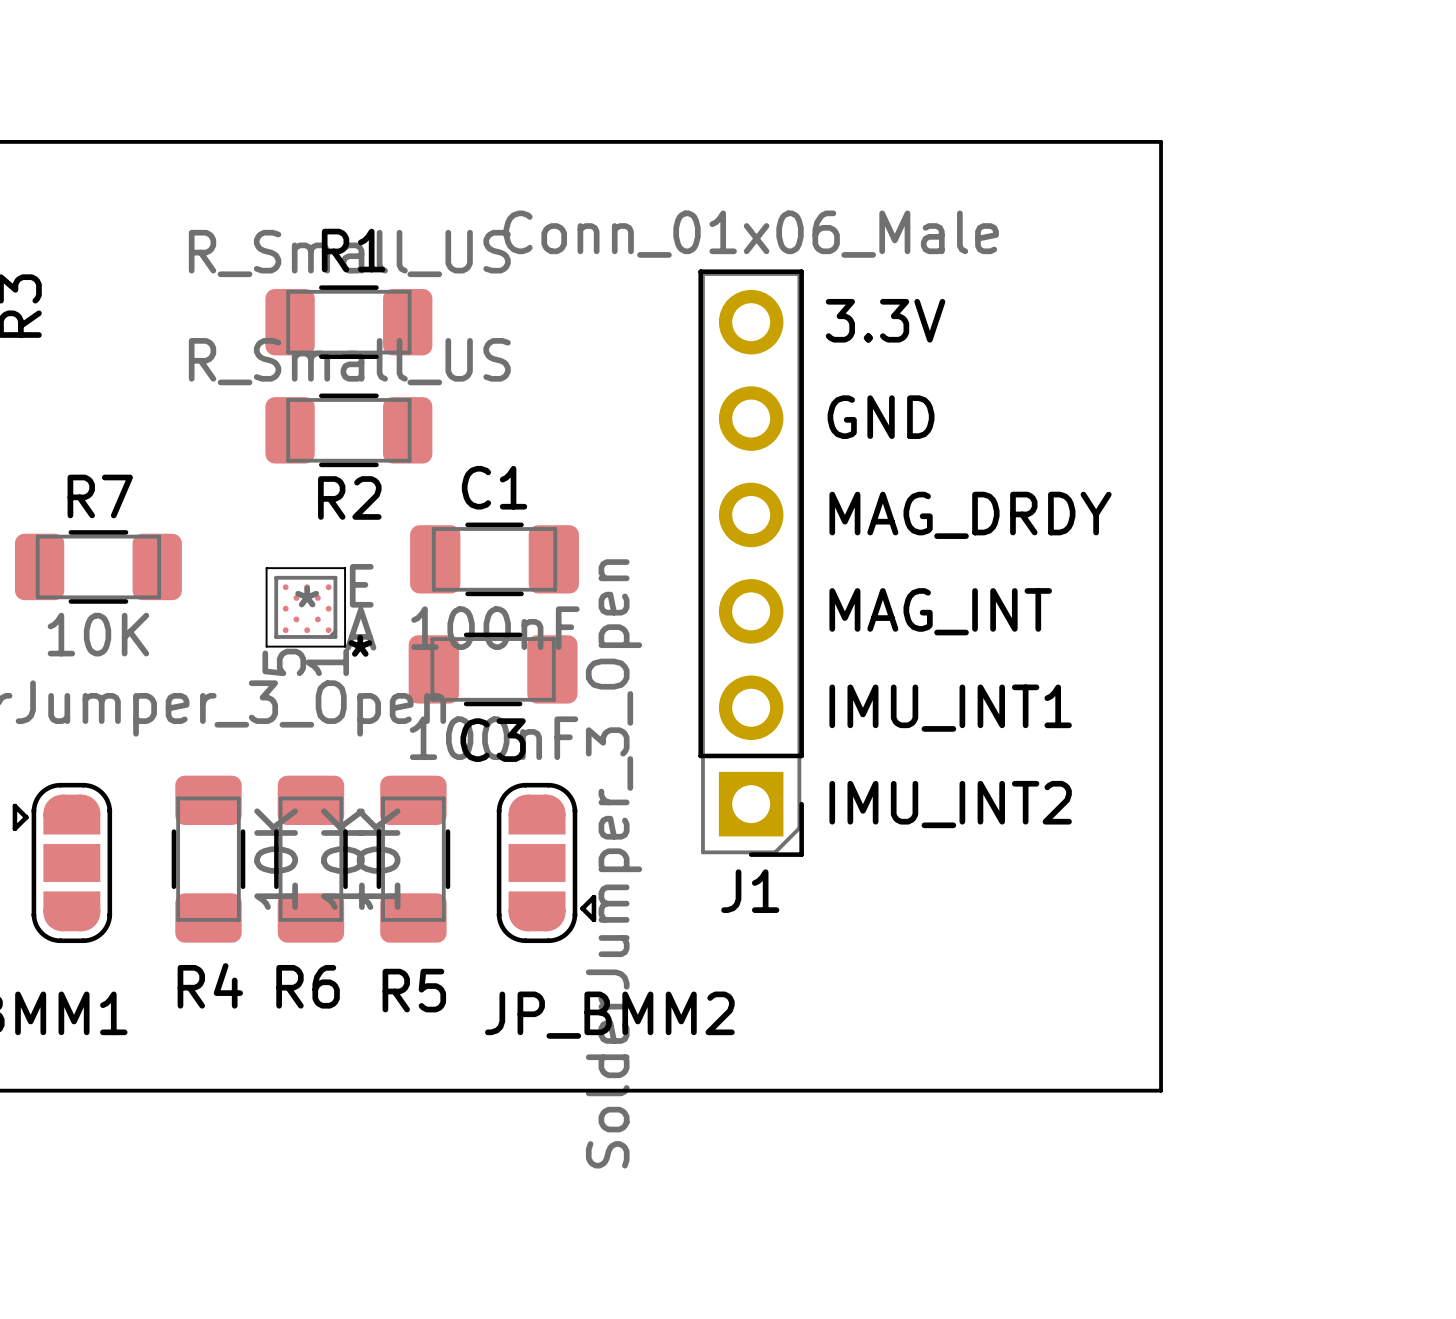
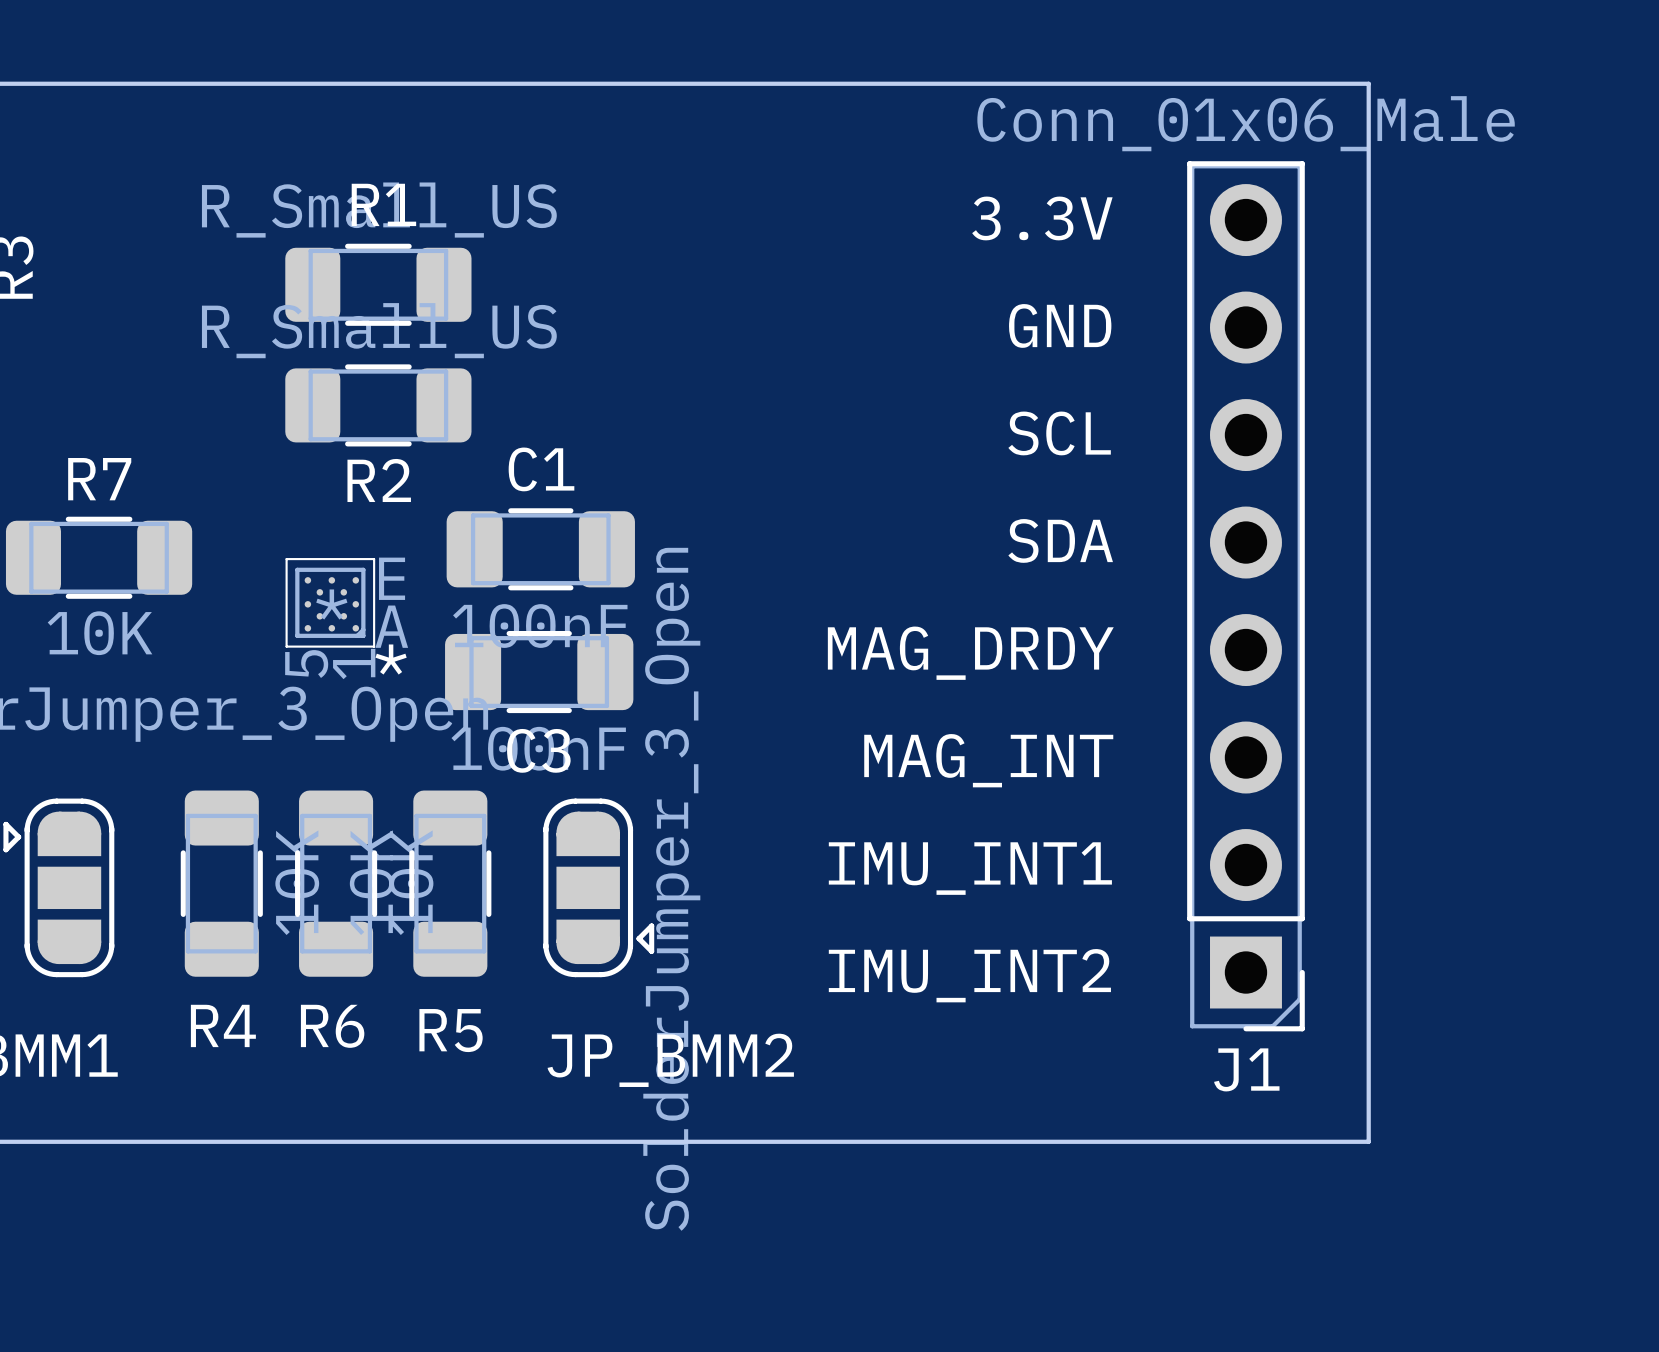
board edge: (1161, 141) (1161, 1090) -> (1284, 83) (1368, 83) (1368, 1141) (1284, 1141)
J1 value position: Conn_01x06_Male (751, 234) -> Conn_01x06_Male (1246, 123)
J1 footprint: [698, 269, 804, 857] -> [1187, 161, 1305, 1032]
text position: 3.3V (885, 320) -> 3.3V (1042, 218)
text position: GND (881, 417) -> GND (1060, 325)
text: none -> SCL (1059, 433)
text position: MAG_DRDY (970, 515) -> MAG_DRDY (970, 653)
text: none -> SDA (1060, 540)
text position: MAG_INT (940, 611) -> MAG_INT (988, 760)
text position: IMU_INT1 (950, 708) -> IMU_INT1 (970, 868)
text position: IMU_INT2 (950, 804) -> IMU_INT2 (969, 975)
J1 name position: J1 (750, 891) -> J1 (1246, 1069)

